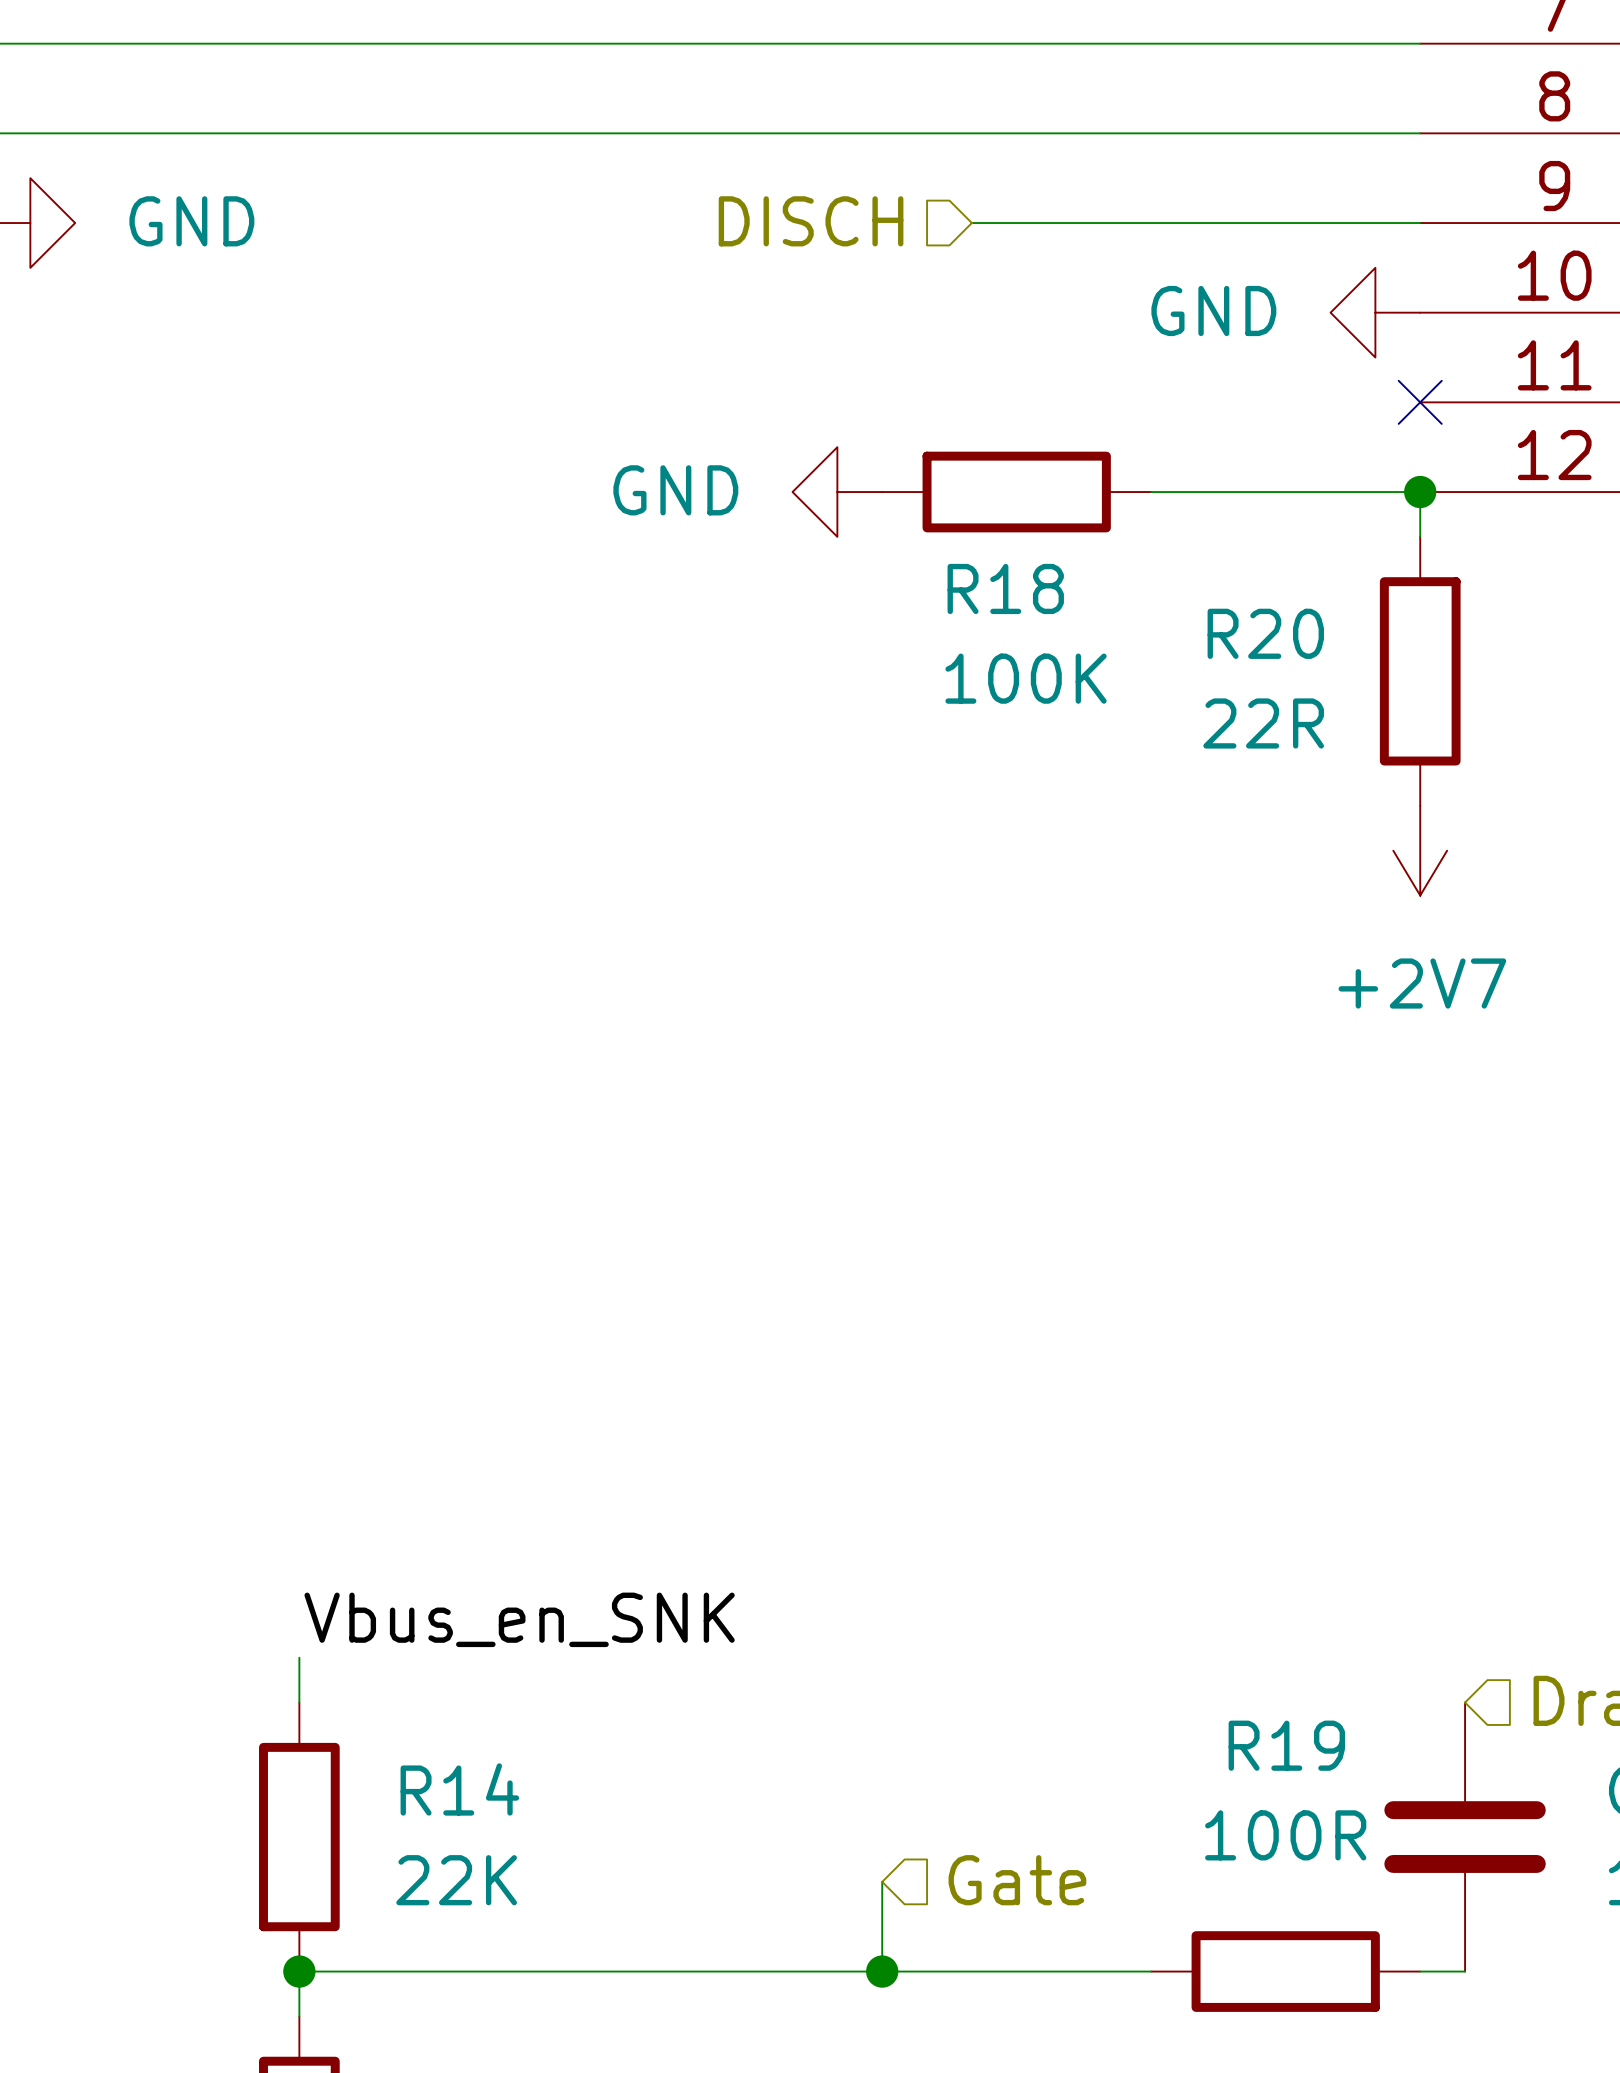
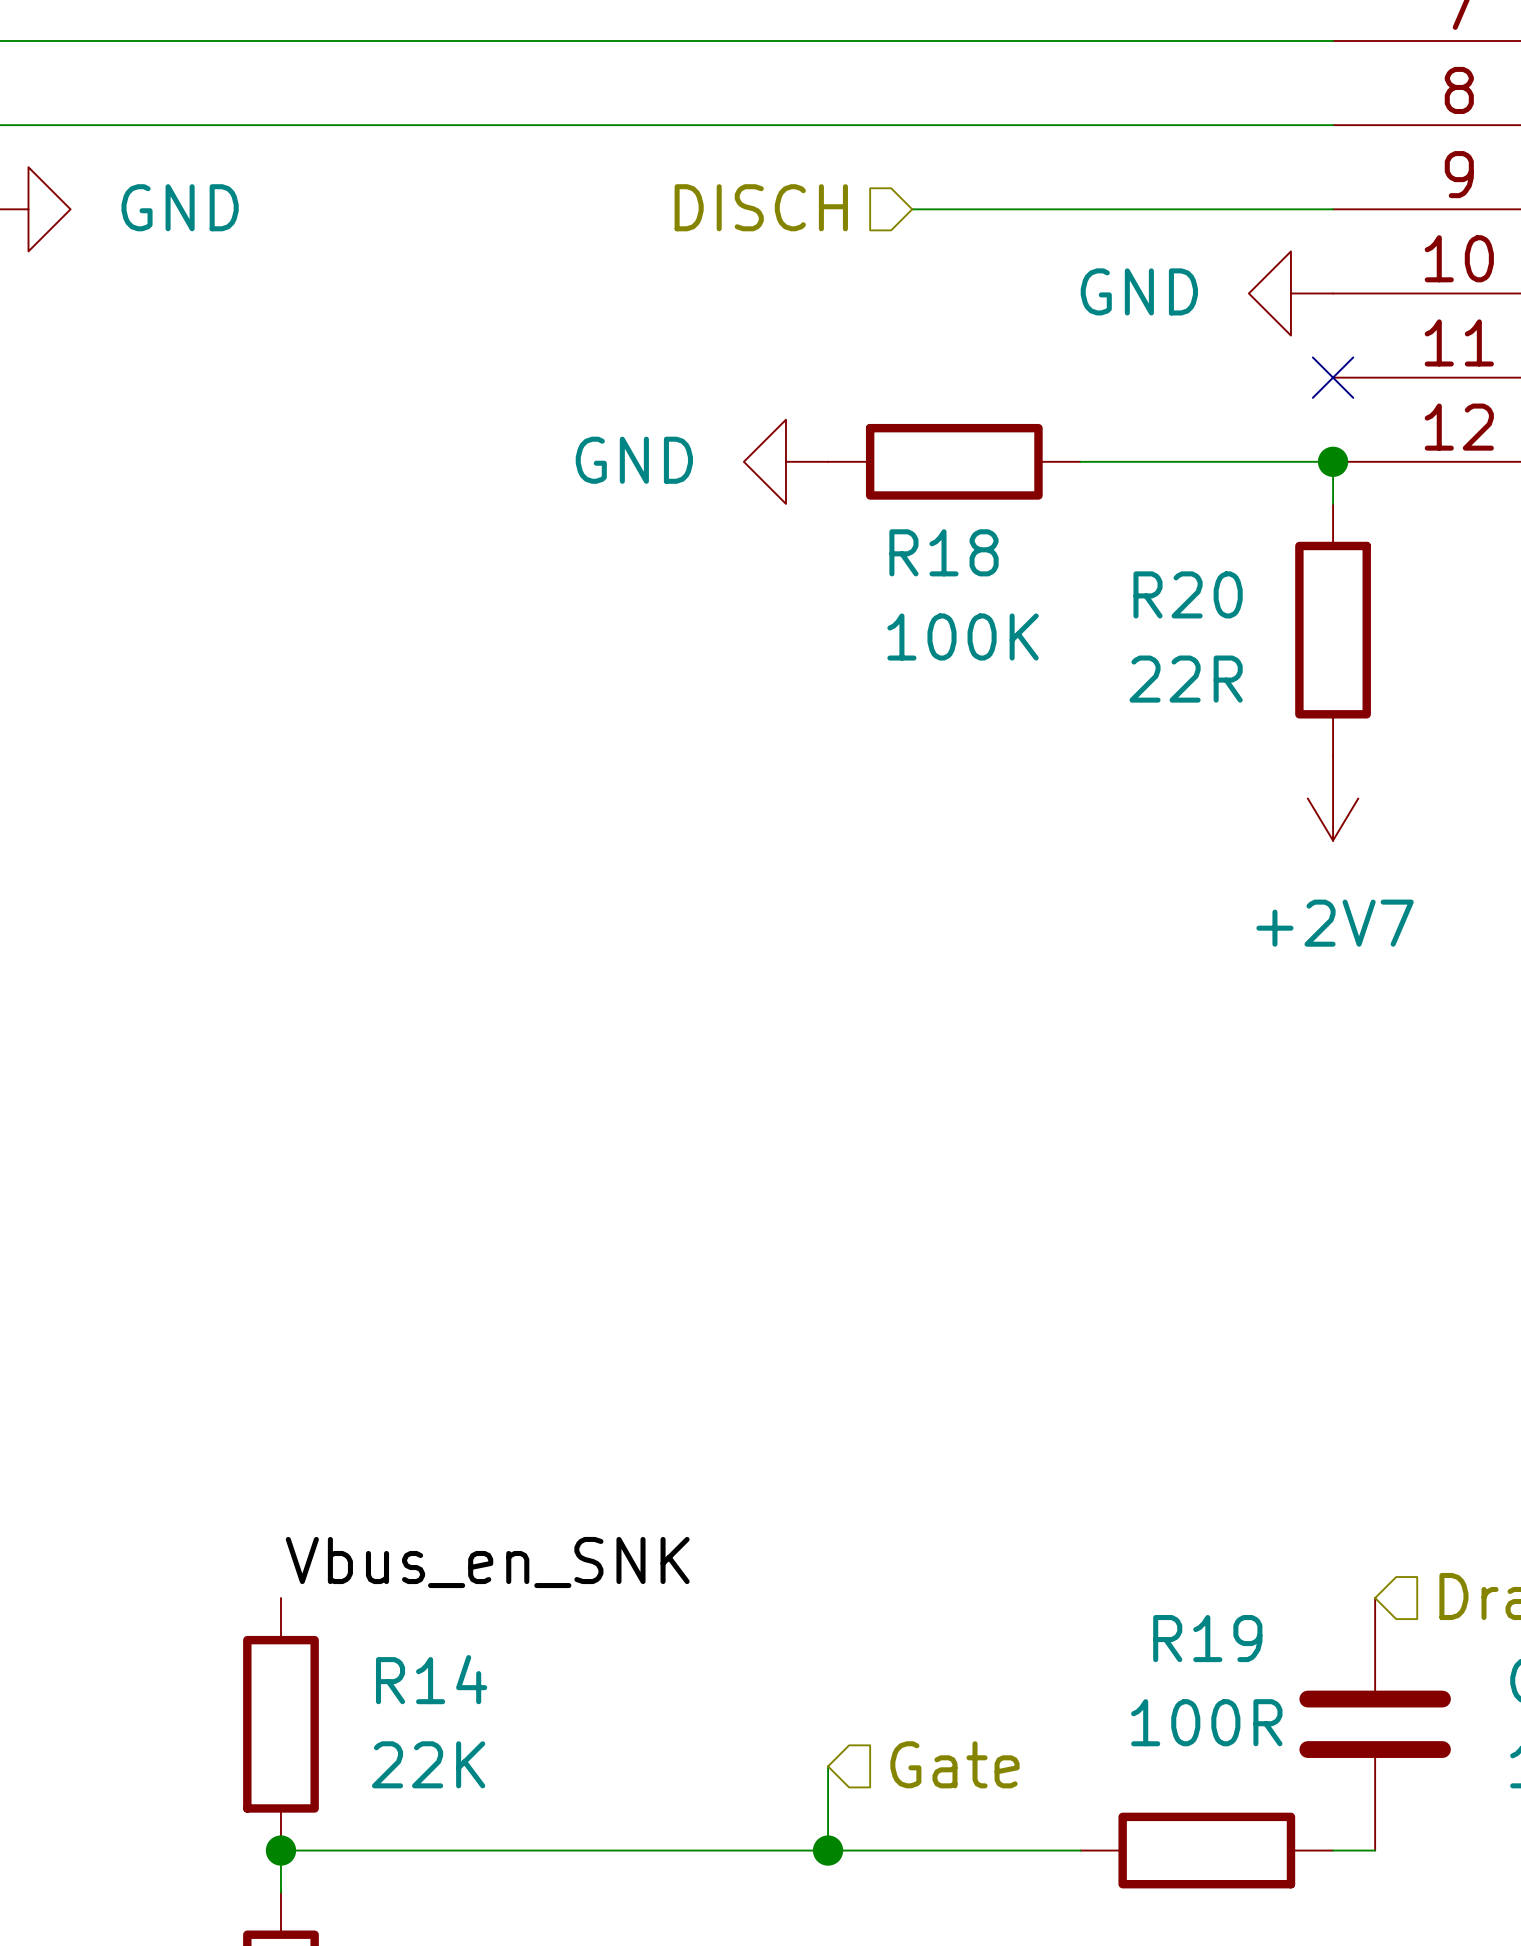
label position: Vbus_en_SNK (519, 1619) -> Vbus_en_SNK (487, 1562)
wire: (299, 1657) (299, 1702) -> none

